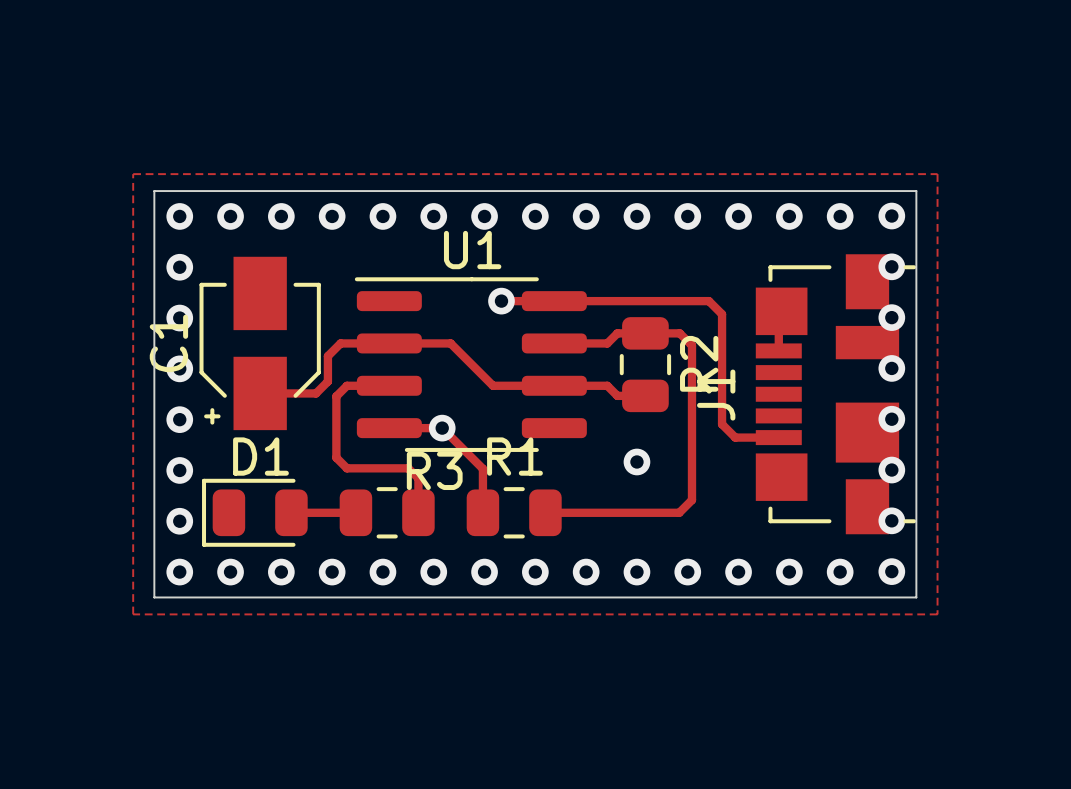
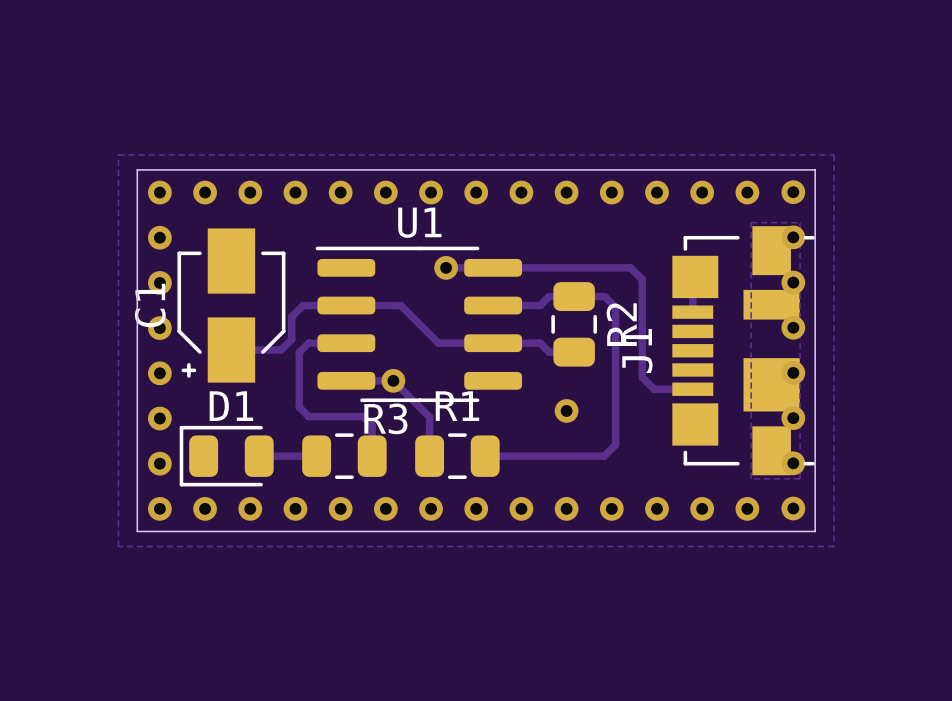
zone outline: none -> (751, 222) (751, 478) (800, 478) (800, 222) (751, 222)

